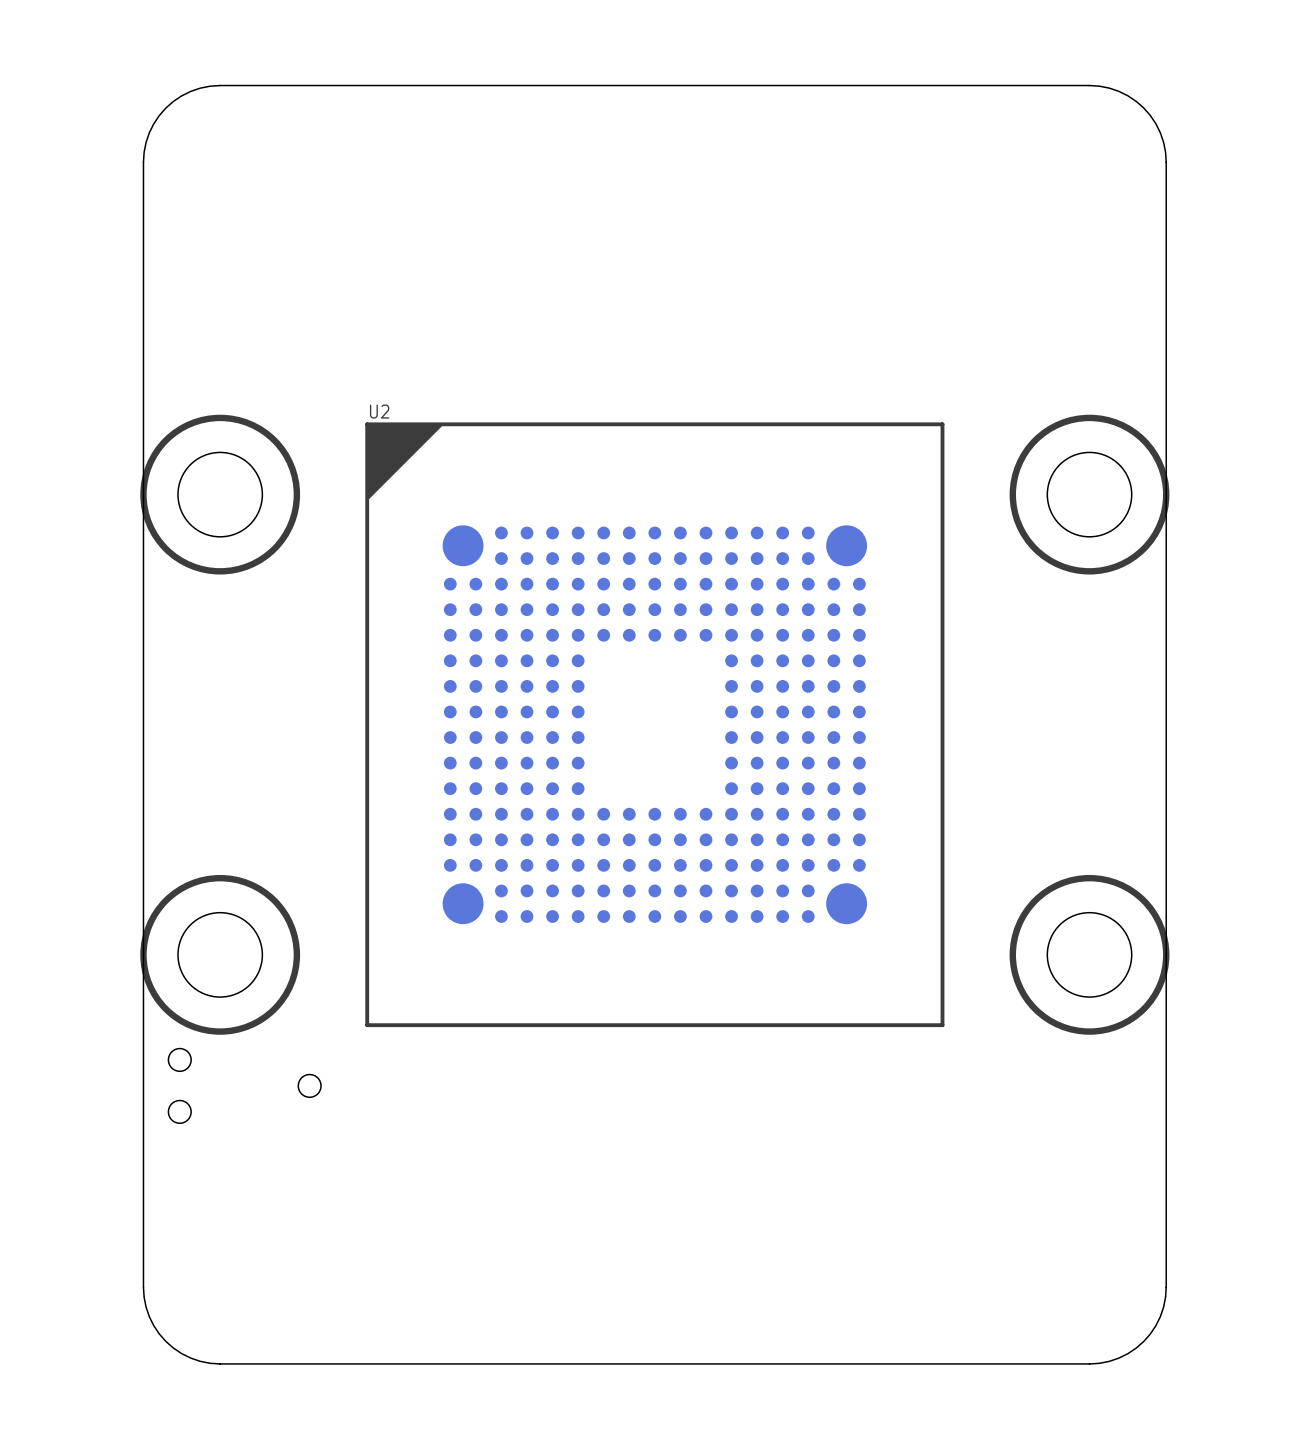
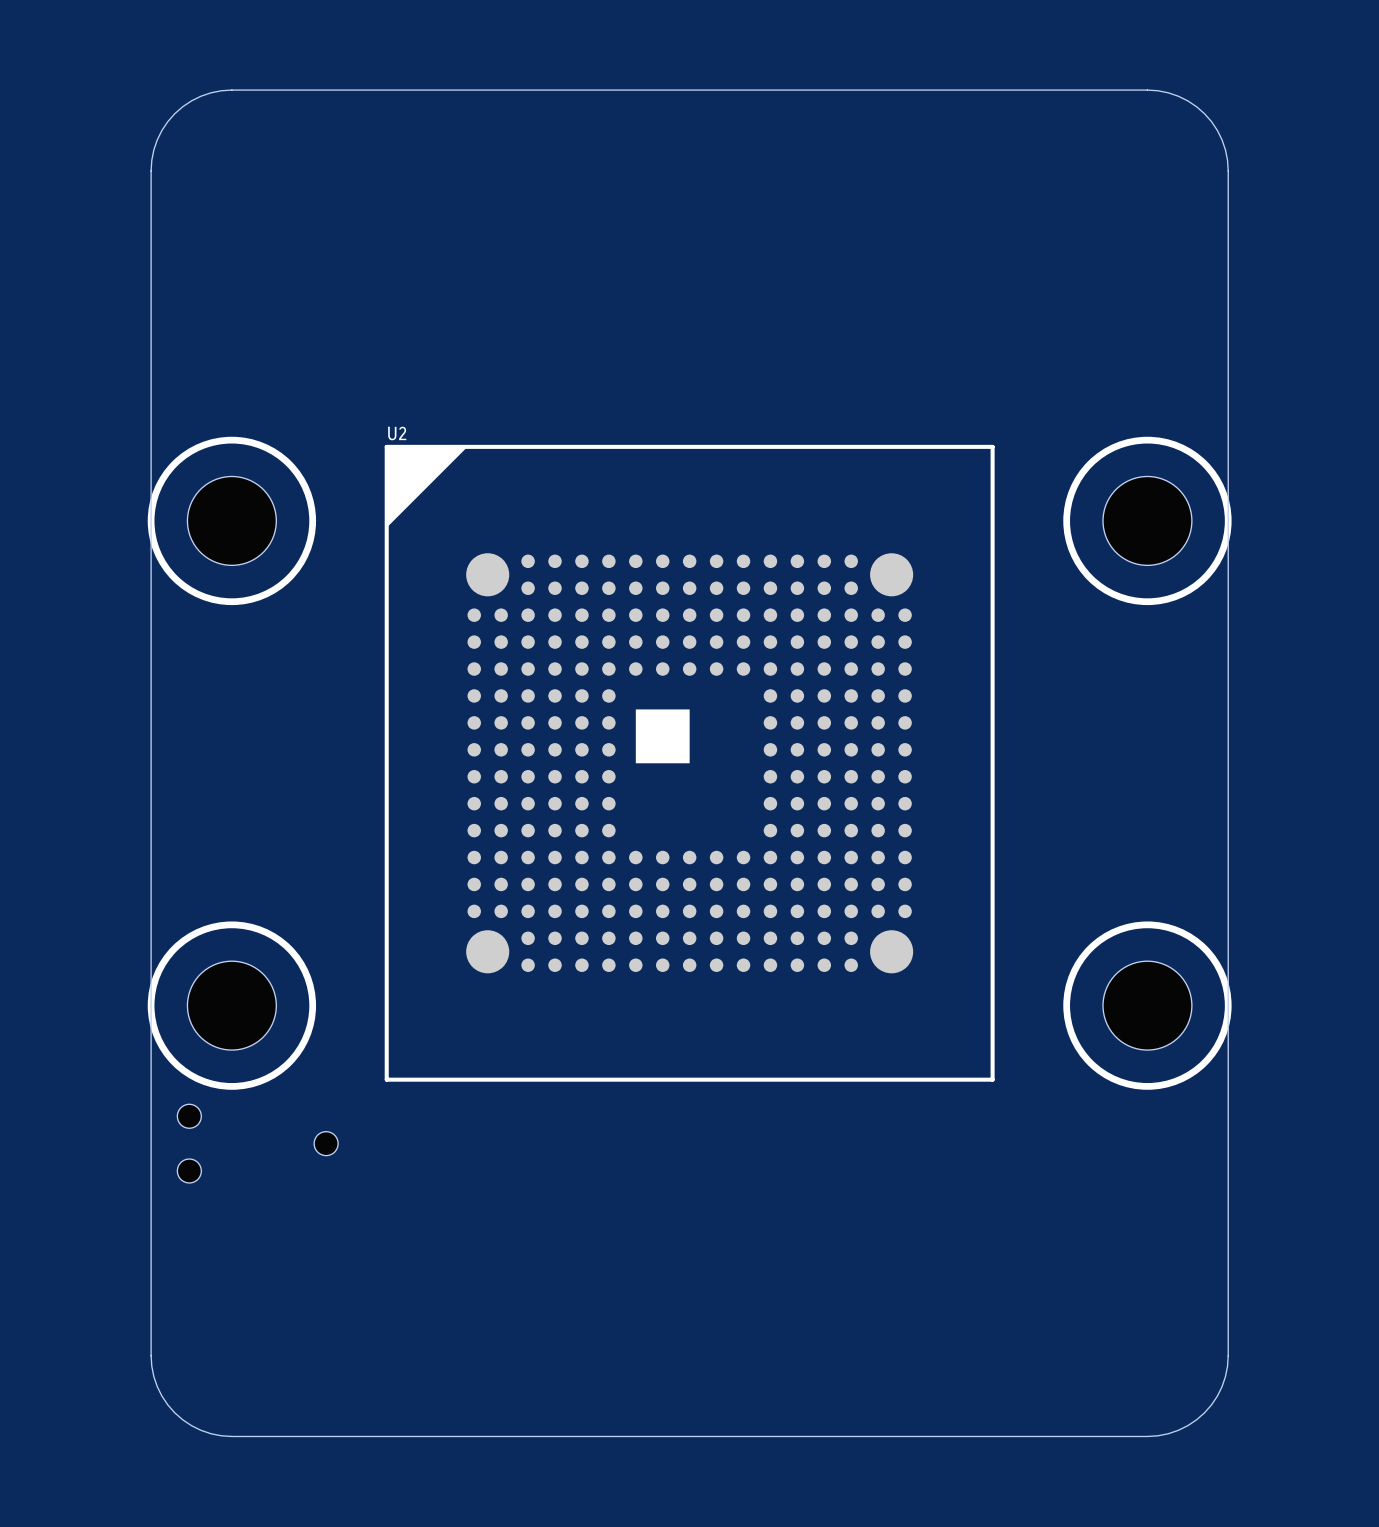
drawing: none -> [635, 709, 690, 764]

